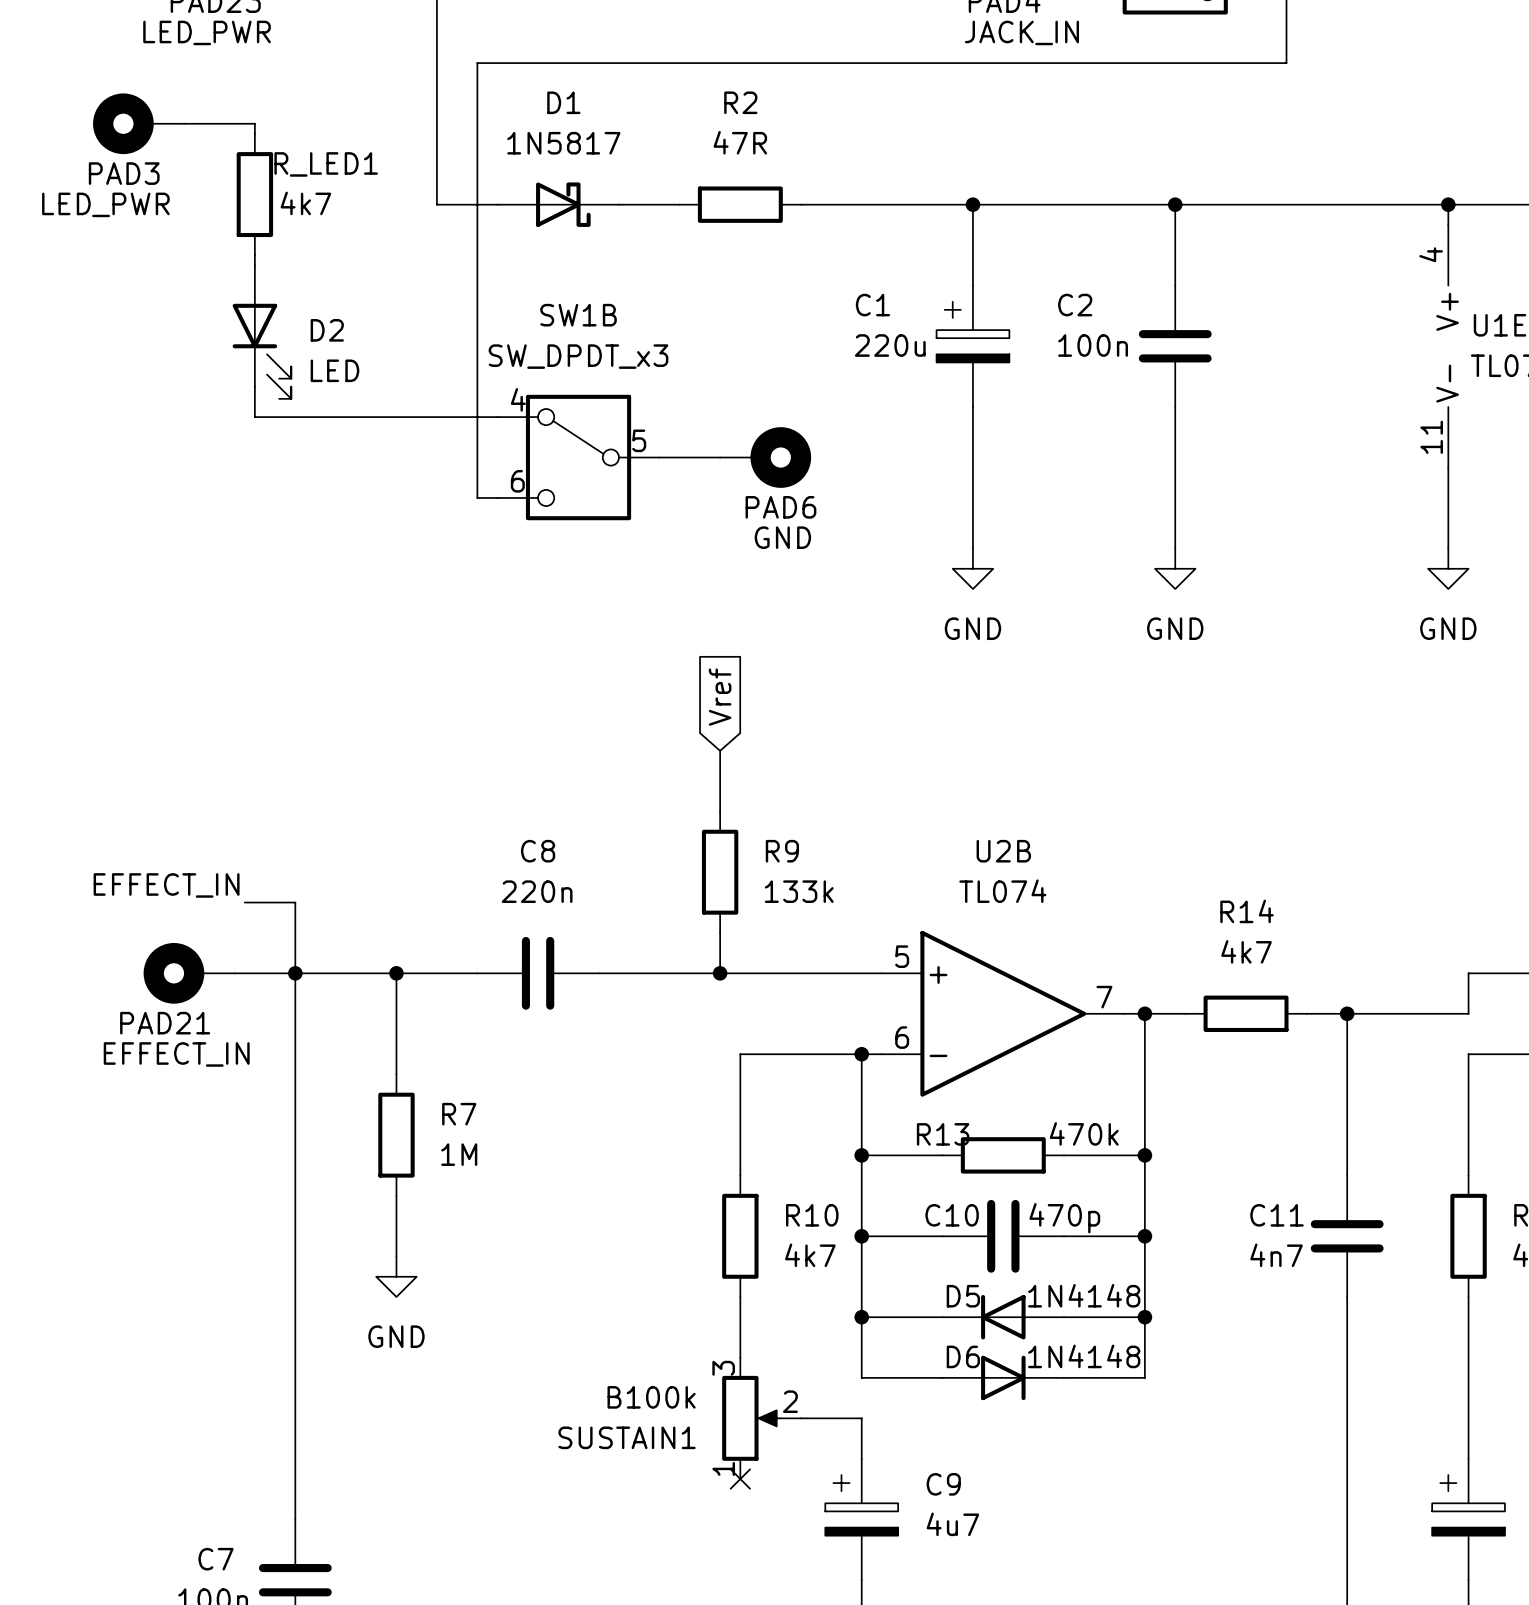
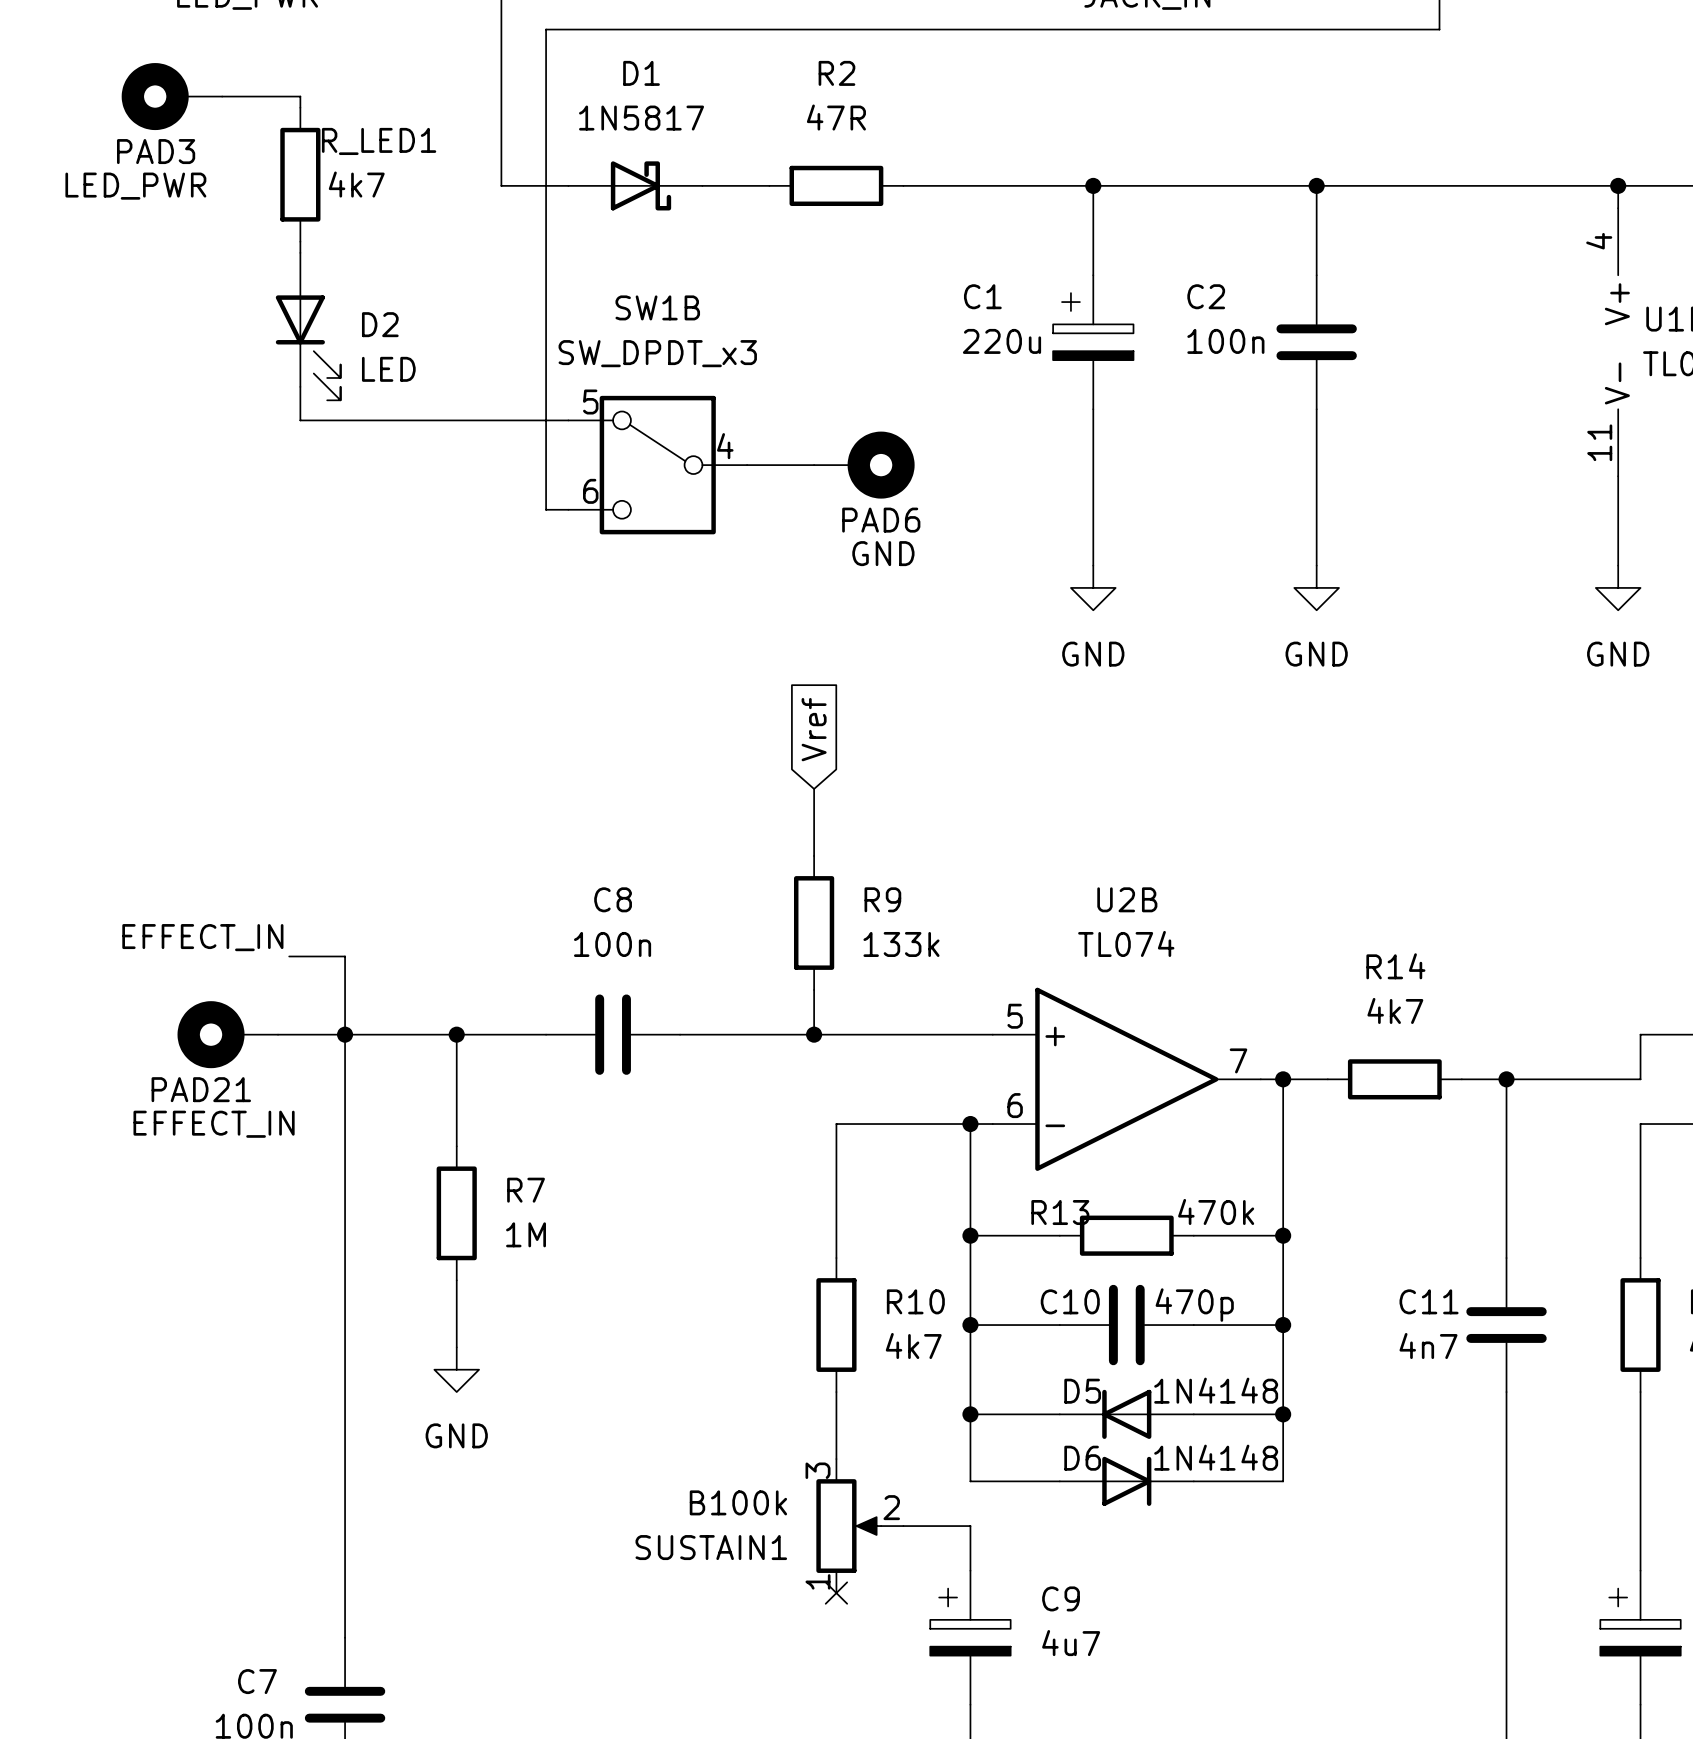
SW1B pin number: 4 (518, 399) -> 5 (590, 402)
SW1B pin number: 5 (639, 440) -> 4 (725, 446)
C8 value: 220n (537, 891) -> 100n (612, 944)

